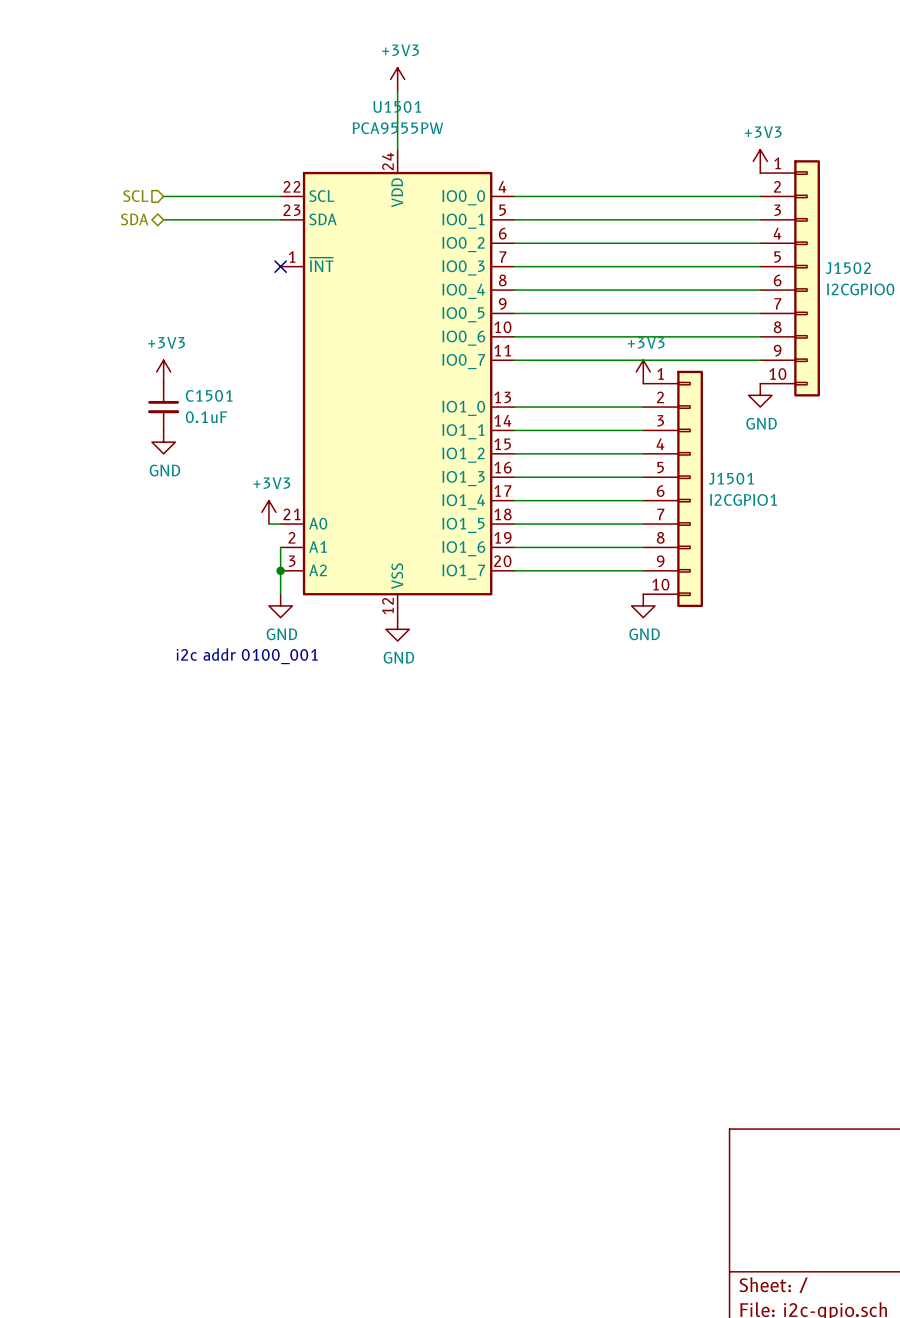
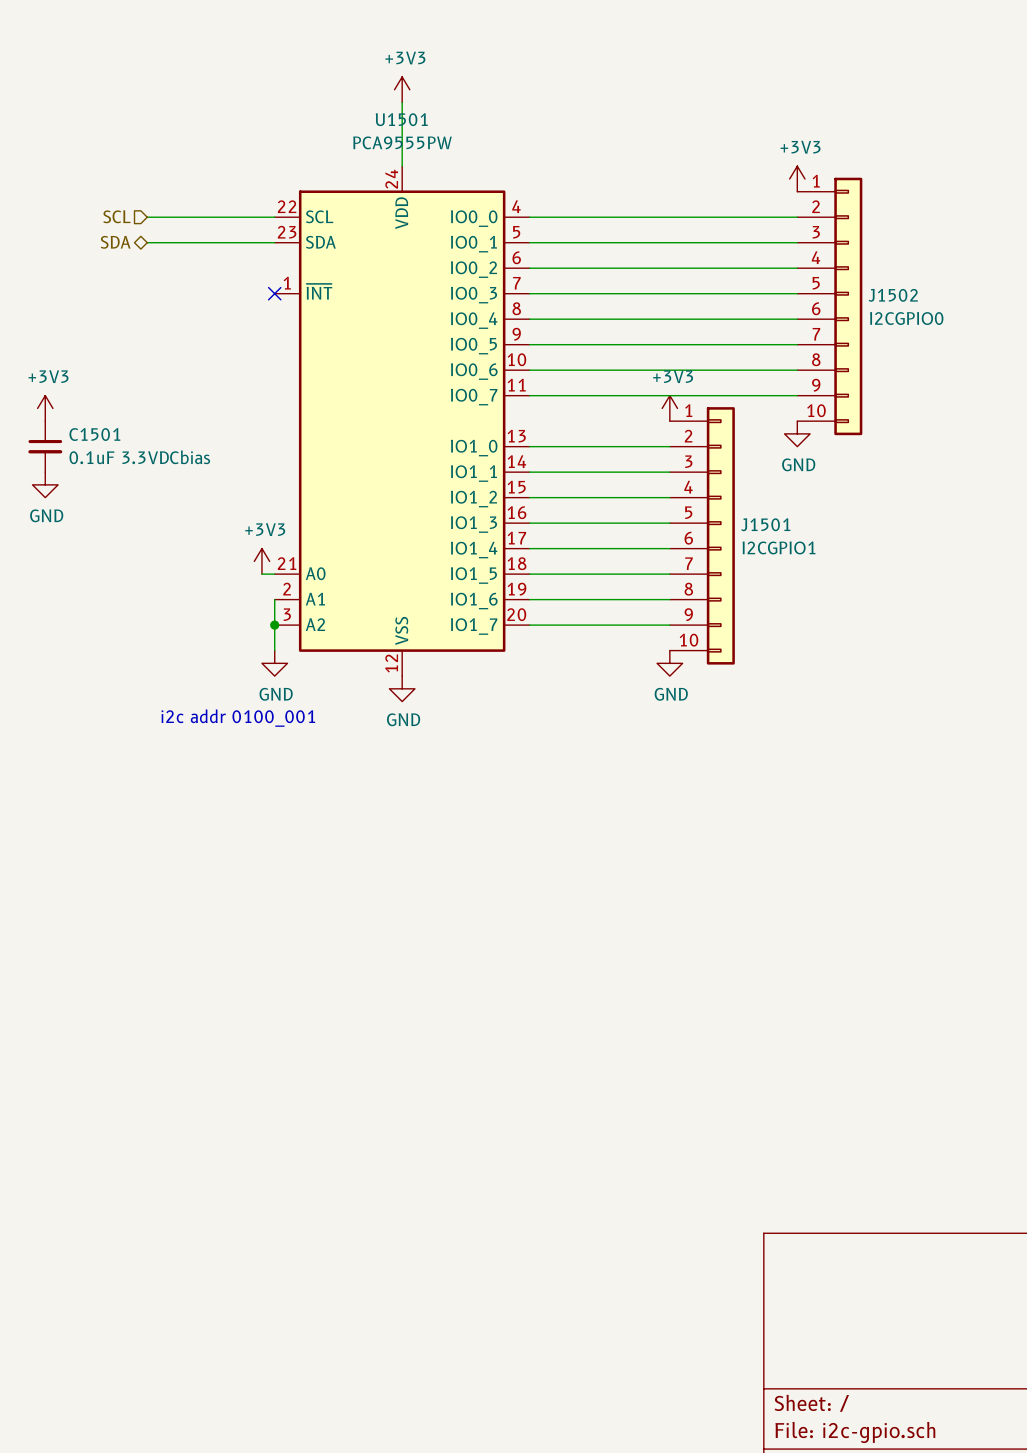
power symbol position: +3V3 (163, 371) -> +3V3 (45, 408)
C1501 position: (163, 407) -> (45, 446)
C1501 value: 0.1uF (206, 417) -> 0.1uF 3.3VDCbias (139, 457)
power symbol position: GND (163, 442) -> GND (45, 484)

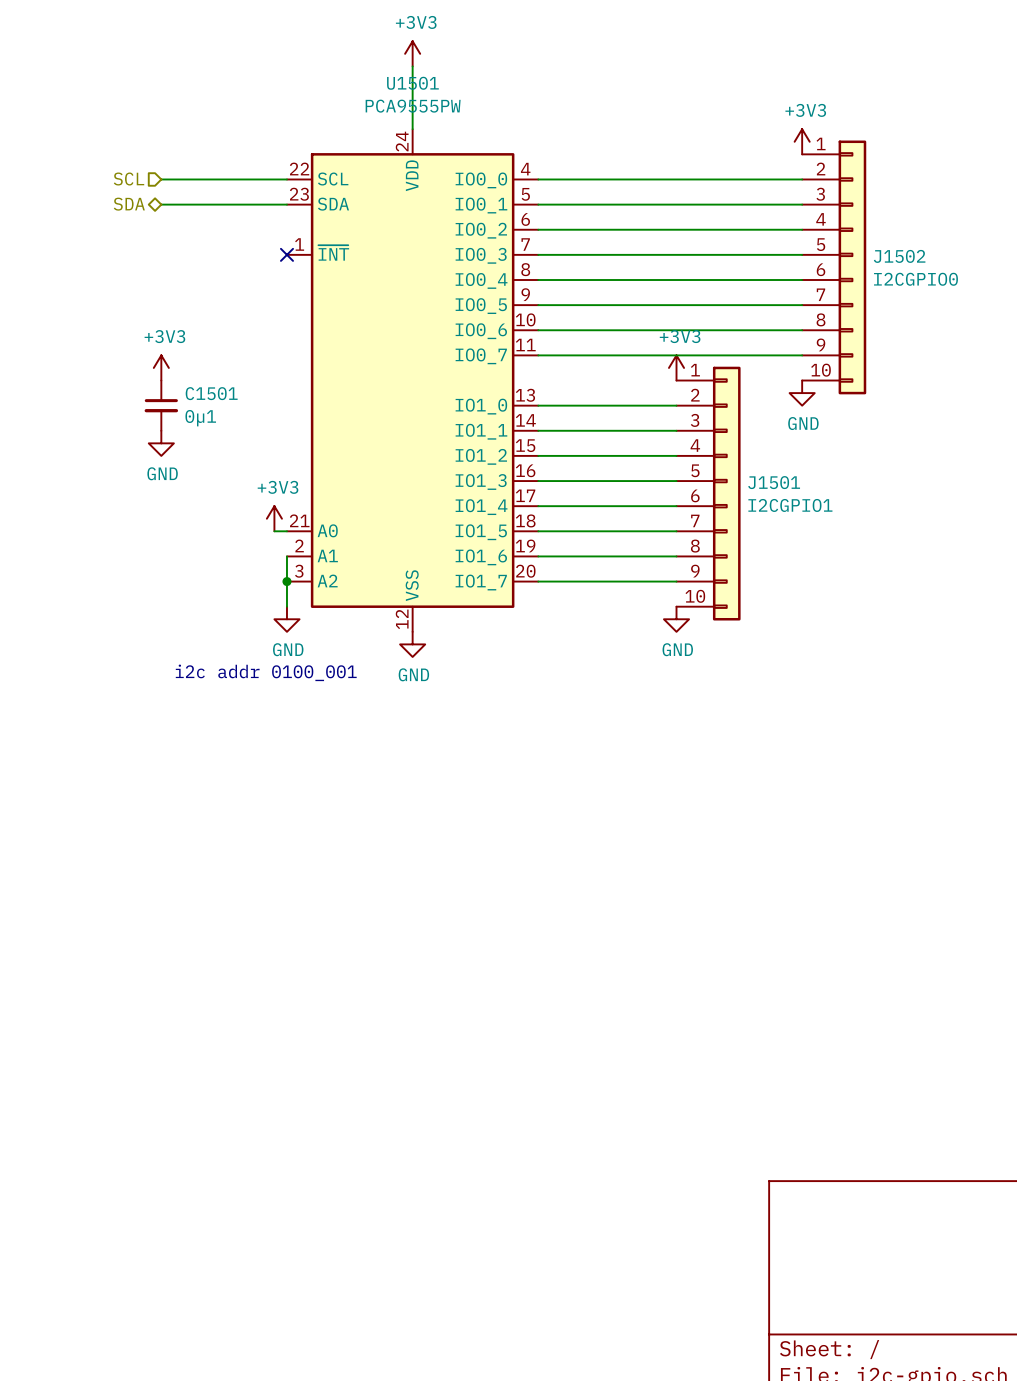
power symbol position: +3V3 (45, 408) -> +3V3 (161, 367)
C1501 position: (45, 446) -> (161, 405)
C1501 value: 0.1uF 3.3VDCbias (139, 457) -> 0µ1 (200, 418)
power symbol position: GND (45, 484) -> GND (161, 443)

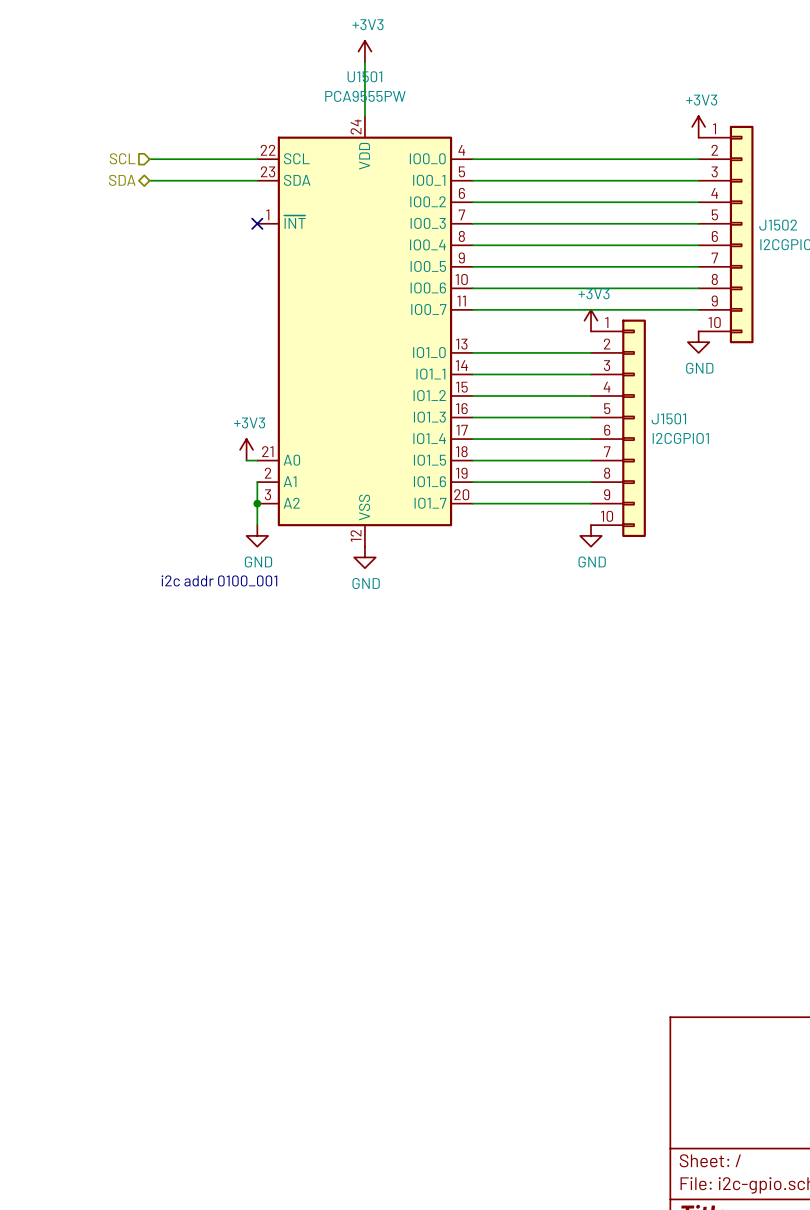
power symbol: +3V3 (161, 367) -> none
C1501: 0µ1 (161, 405) -> none
power symbol: GND (161, 443) -> none

